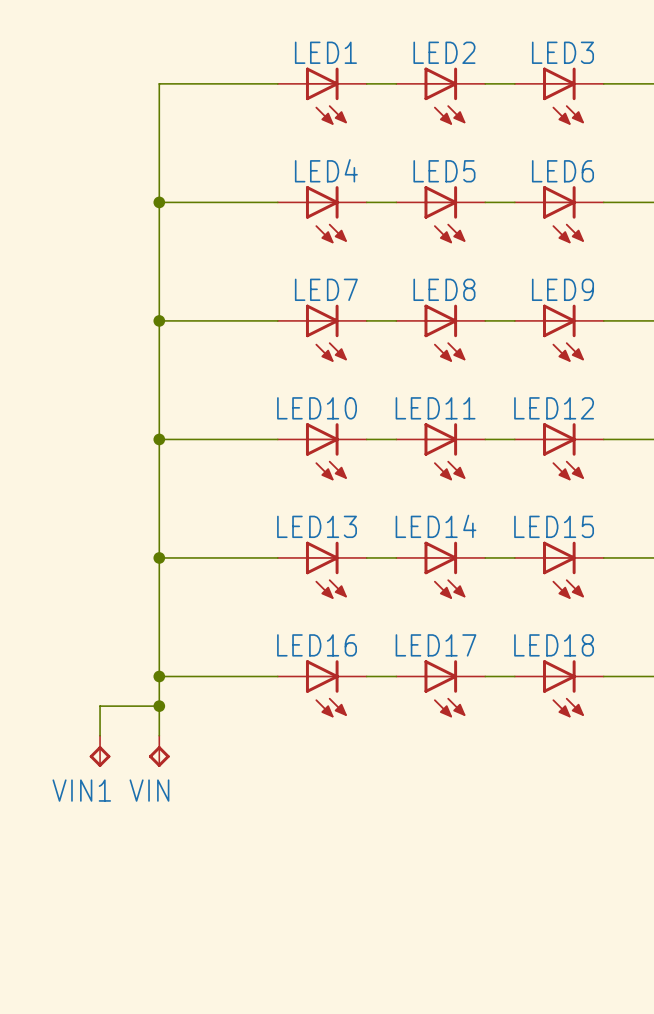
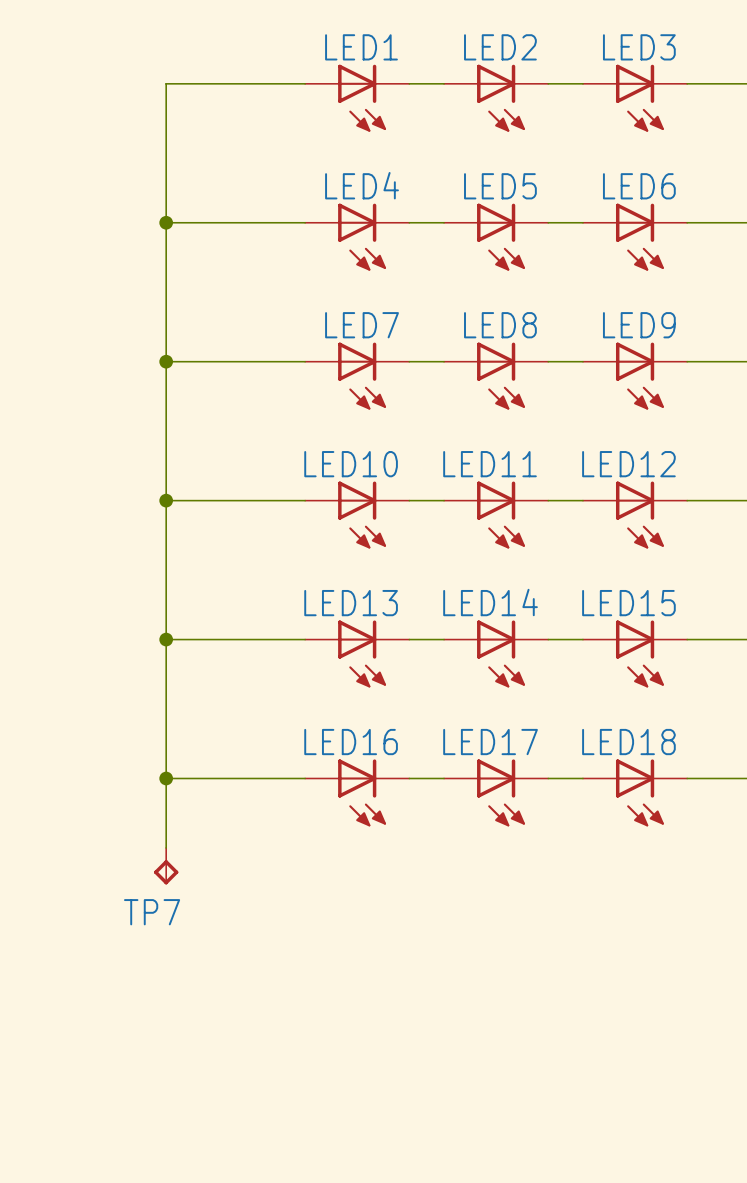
wire: (159, 706) (100, 706) (100, 735) -> none
junction: (159, 706) -> none
VIN1: (100, 751) -> none
VIN name: VIN (149, 790) -> TP7 (152, 912)

